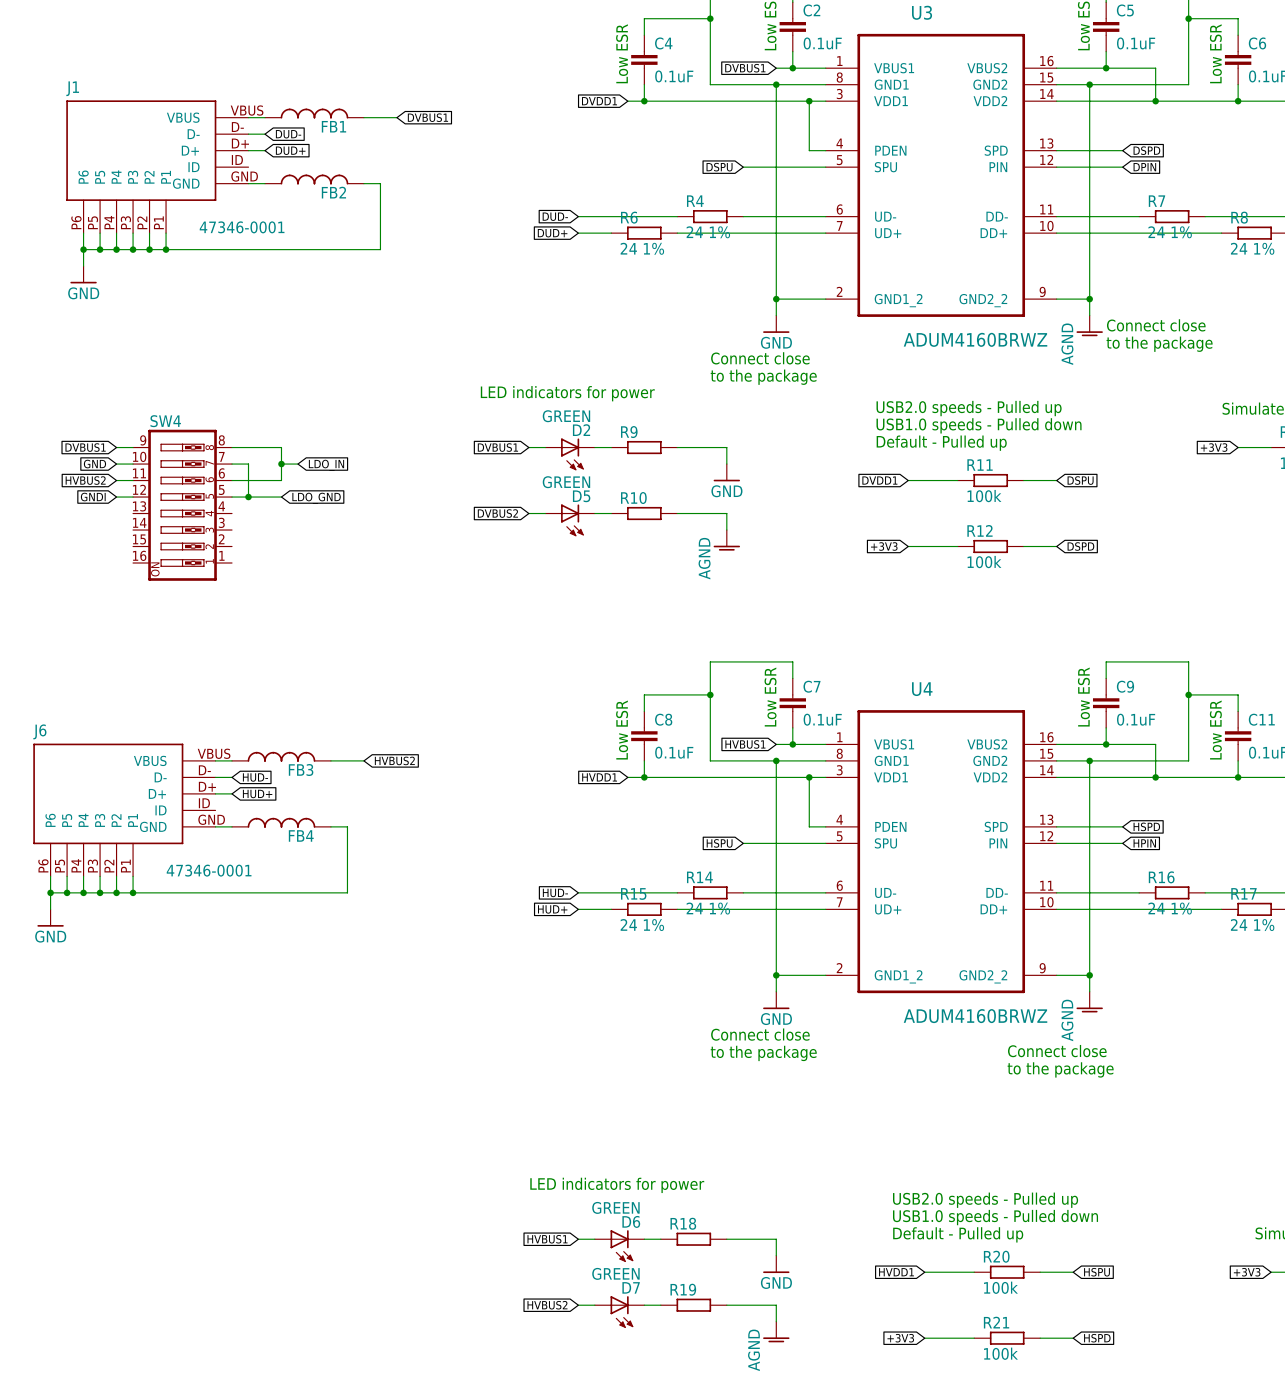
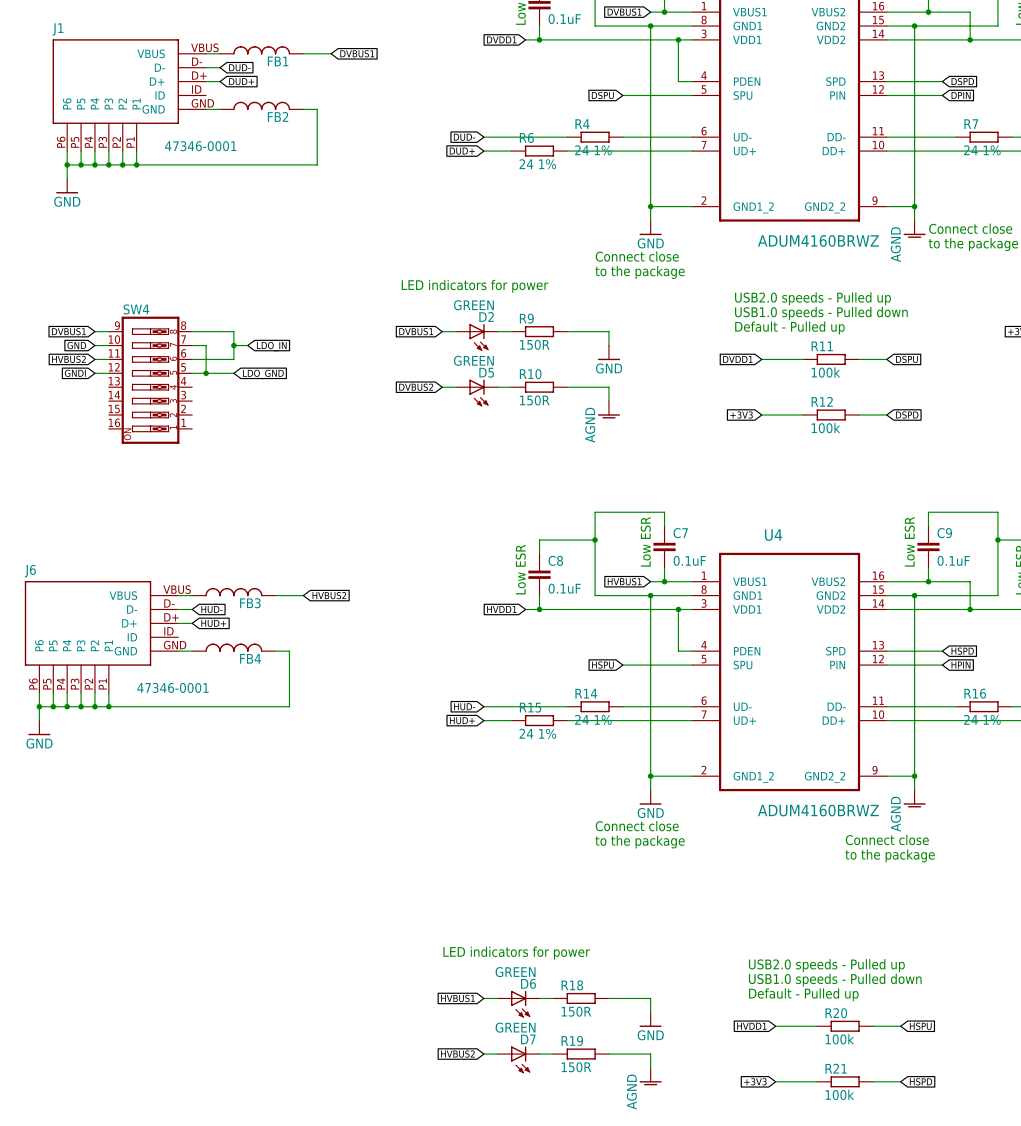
R9 value: none -> 150R (534, 344)
R10 value: none -> 150R (534, 400)
R18 value: none -> 150R (576, 1011)
R19 value: none -> 150R (576, 1067)

